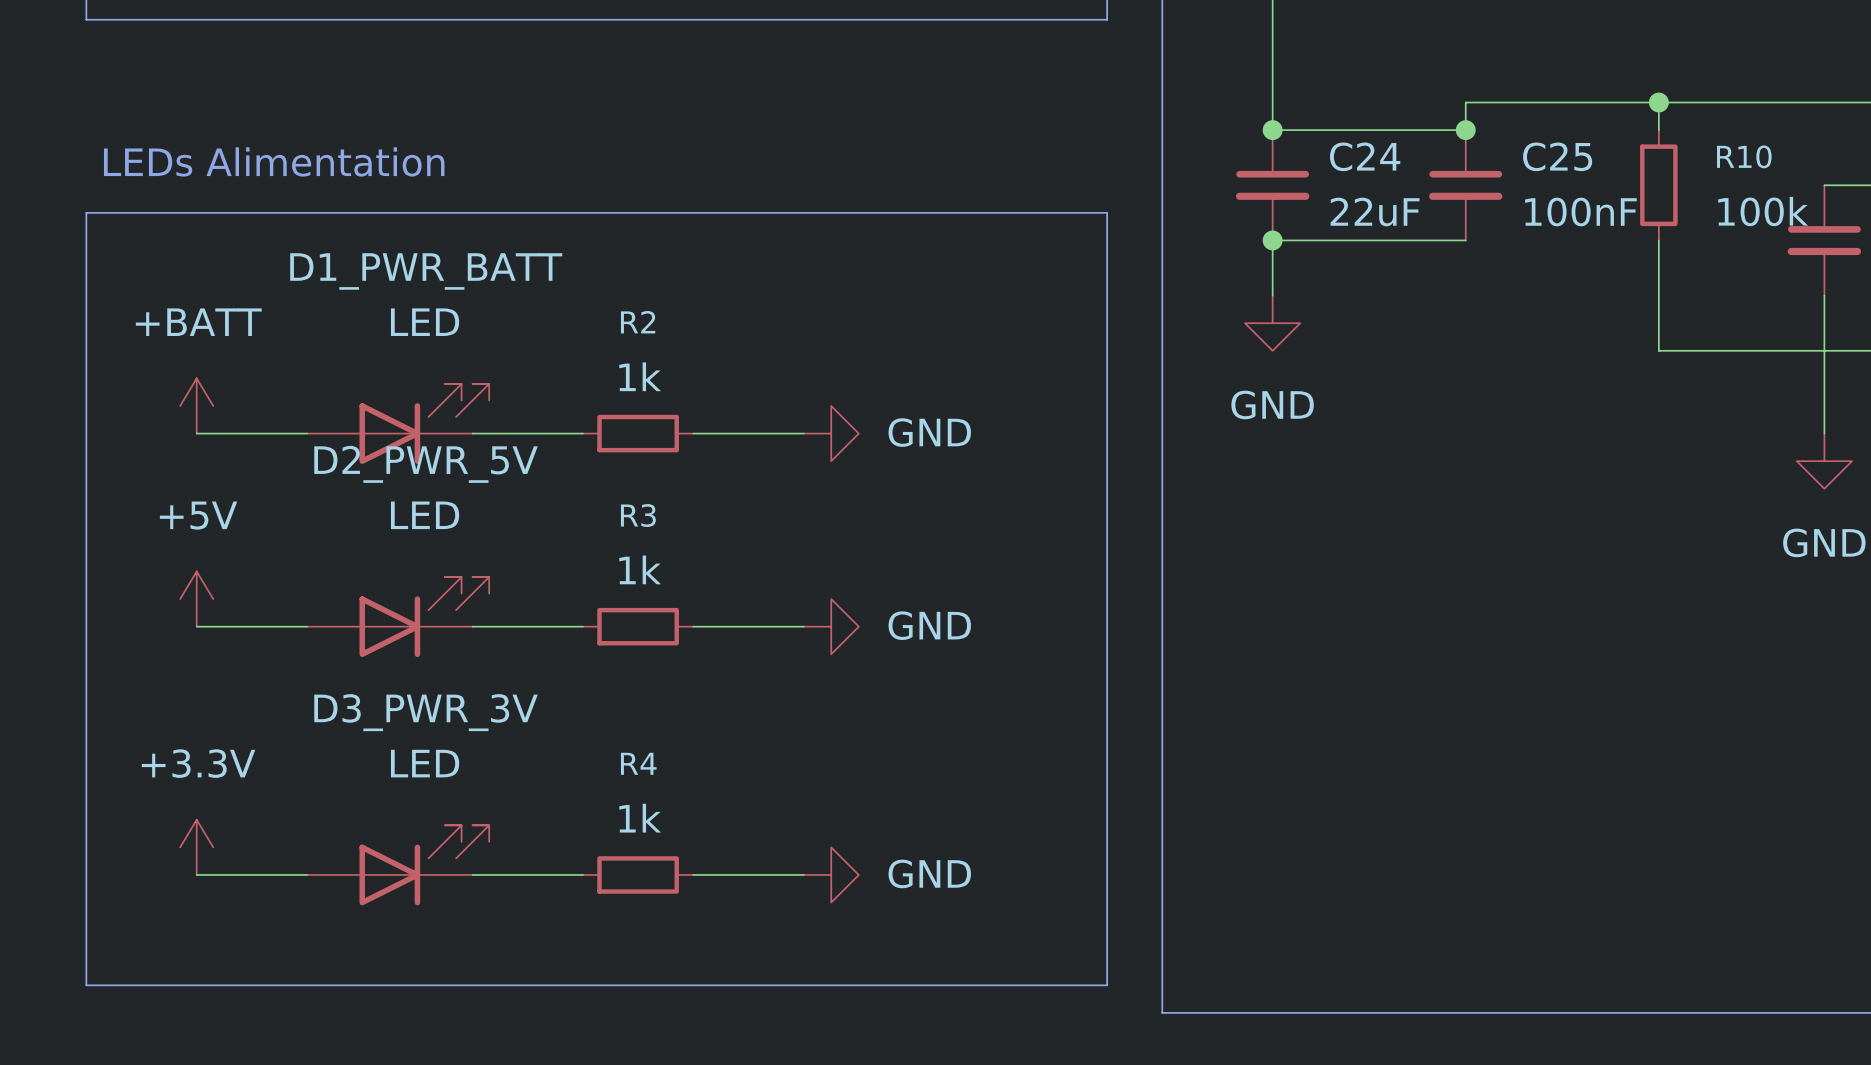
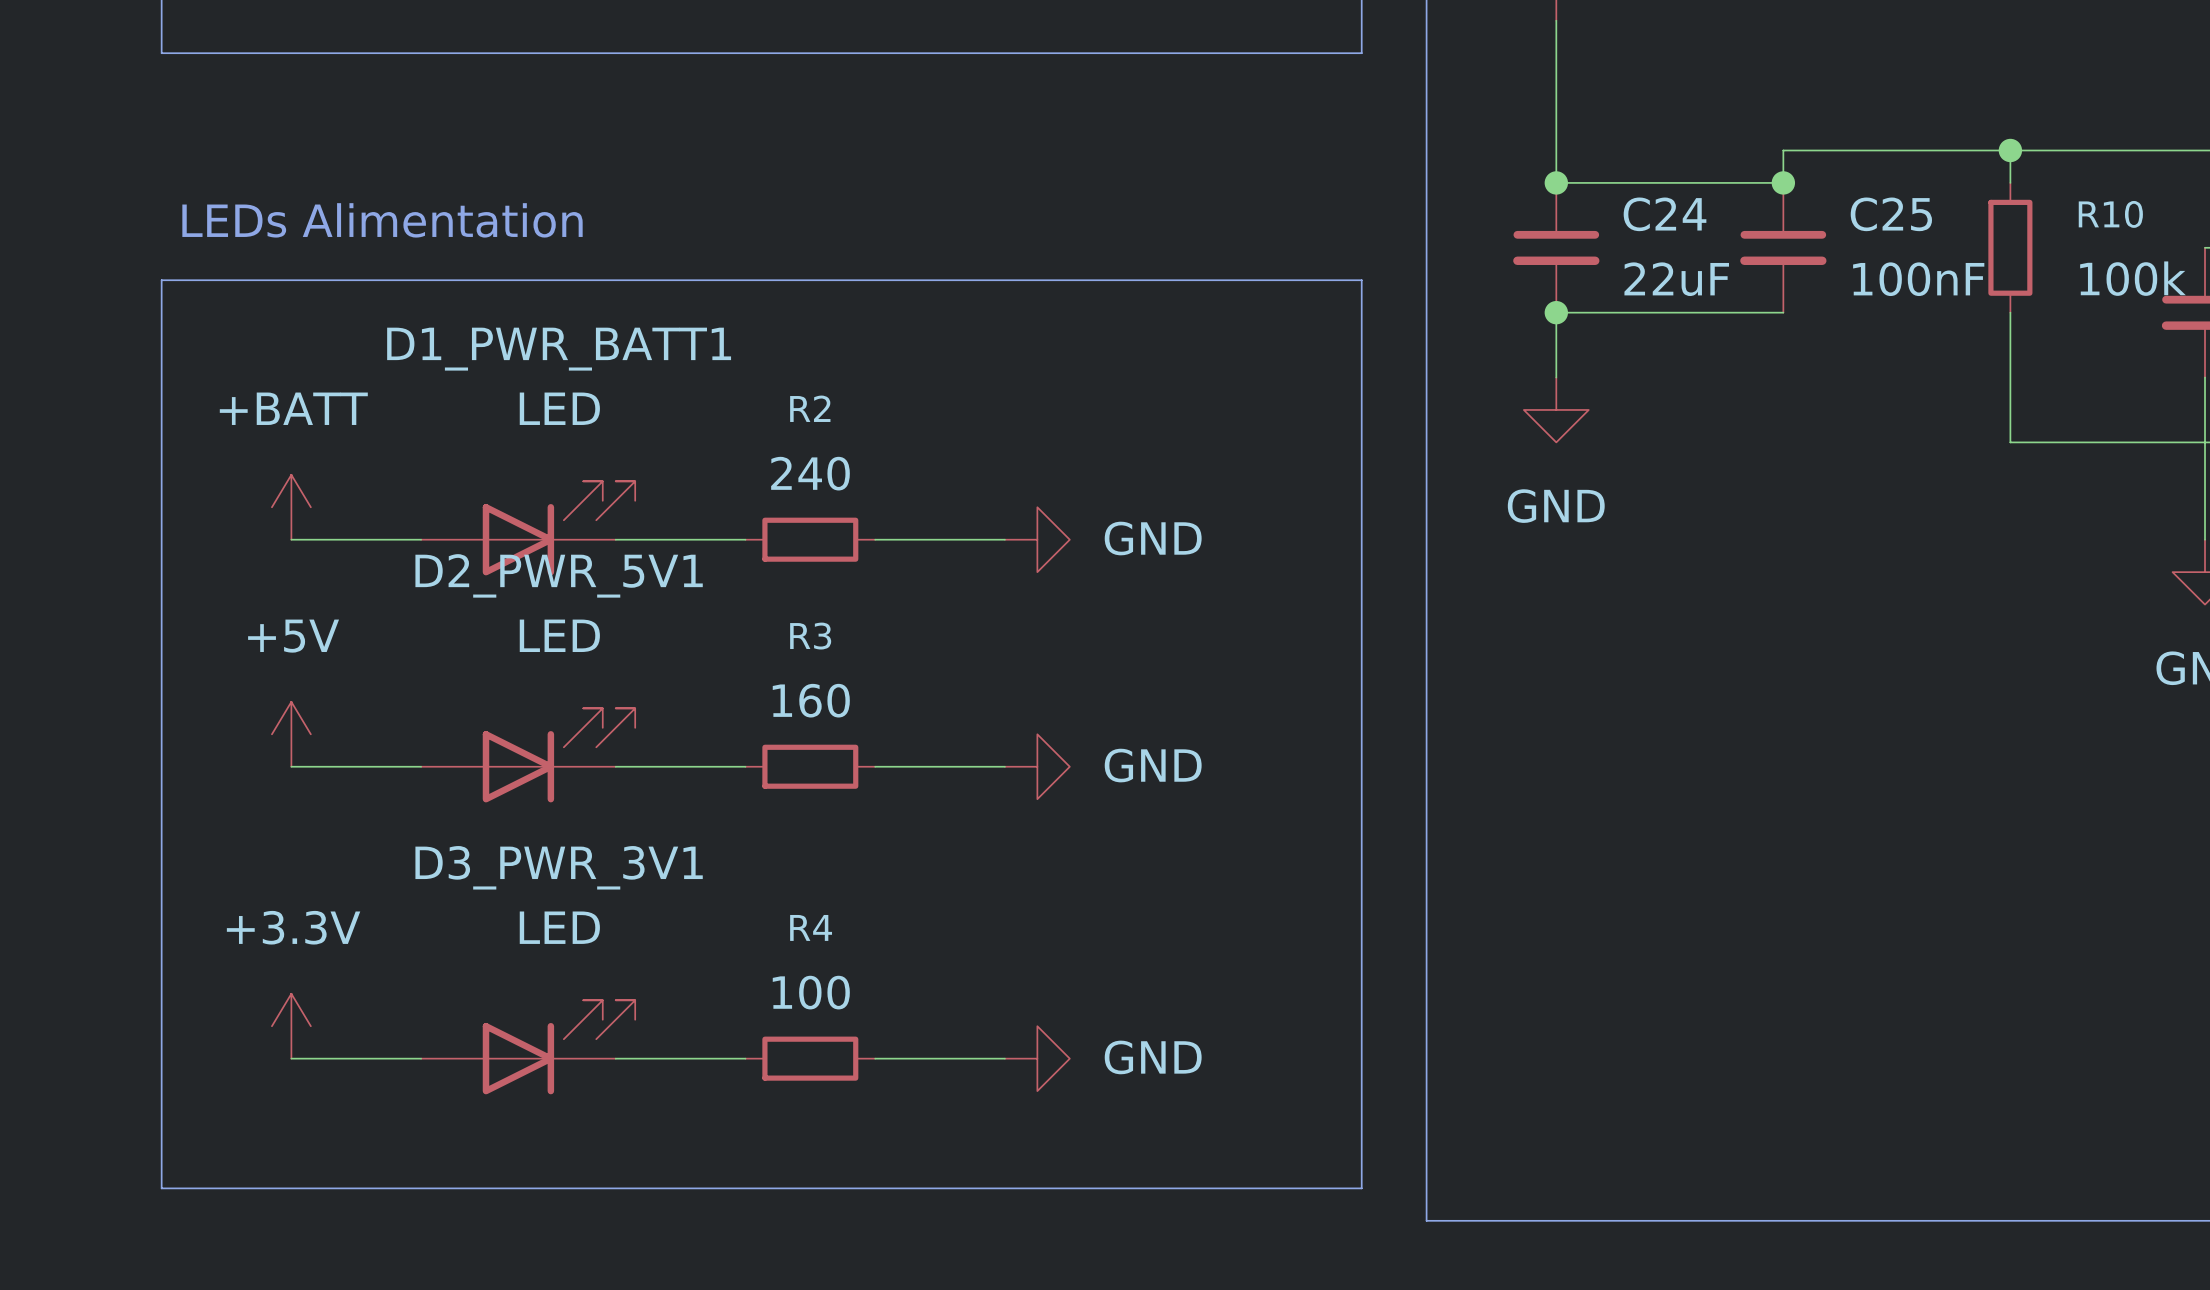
D1_PWR_BATT name: D1_PWR_BATT (426, 271) -> D1_PWR_BATT1 (559, 349)
R2 value: 1k (640, 376) -> 240 (810, 473)
D2_PWR_5V name: D2_PWR_5V (426, 464) -> D2_PWR_5V1 (559, 575)
R3 value: 1k (640, 569) -> 160 (811, 700)
D3_PWR_3V name: D3_PWR_3V (426, 712) -> D3_PWR_3V1 (559, 867)
R4 value: 1k (640, 818) -> 100 (811, 992)

